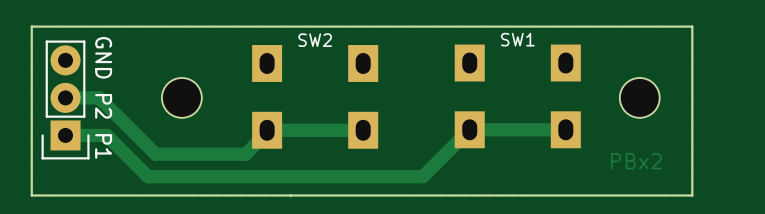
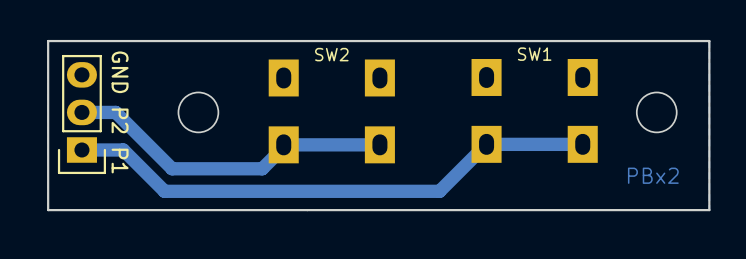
GND P2 P1 footprint: [41, 40, 90, 160] -> [57, 54, 106, 175]

